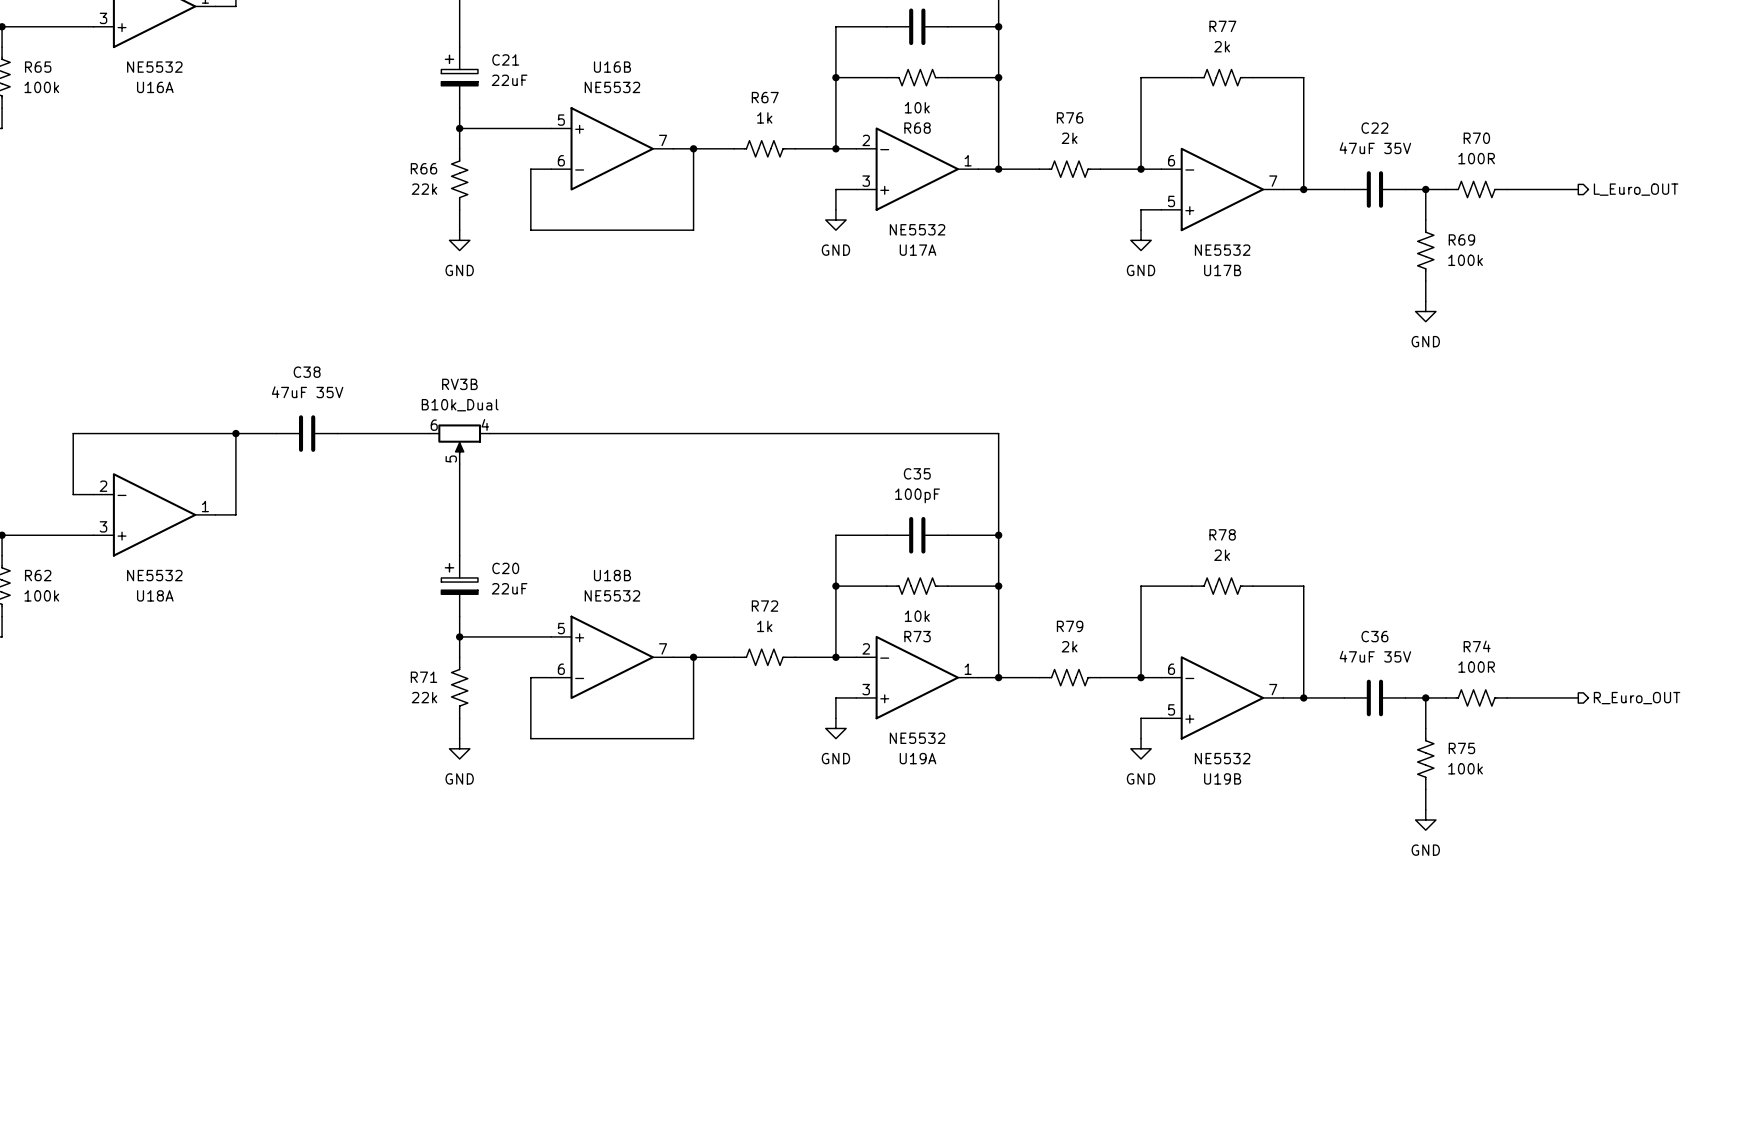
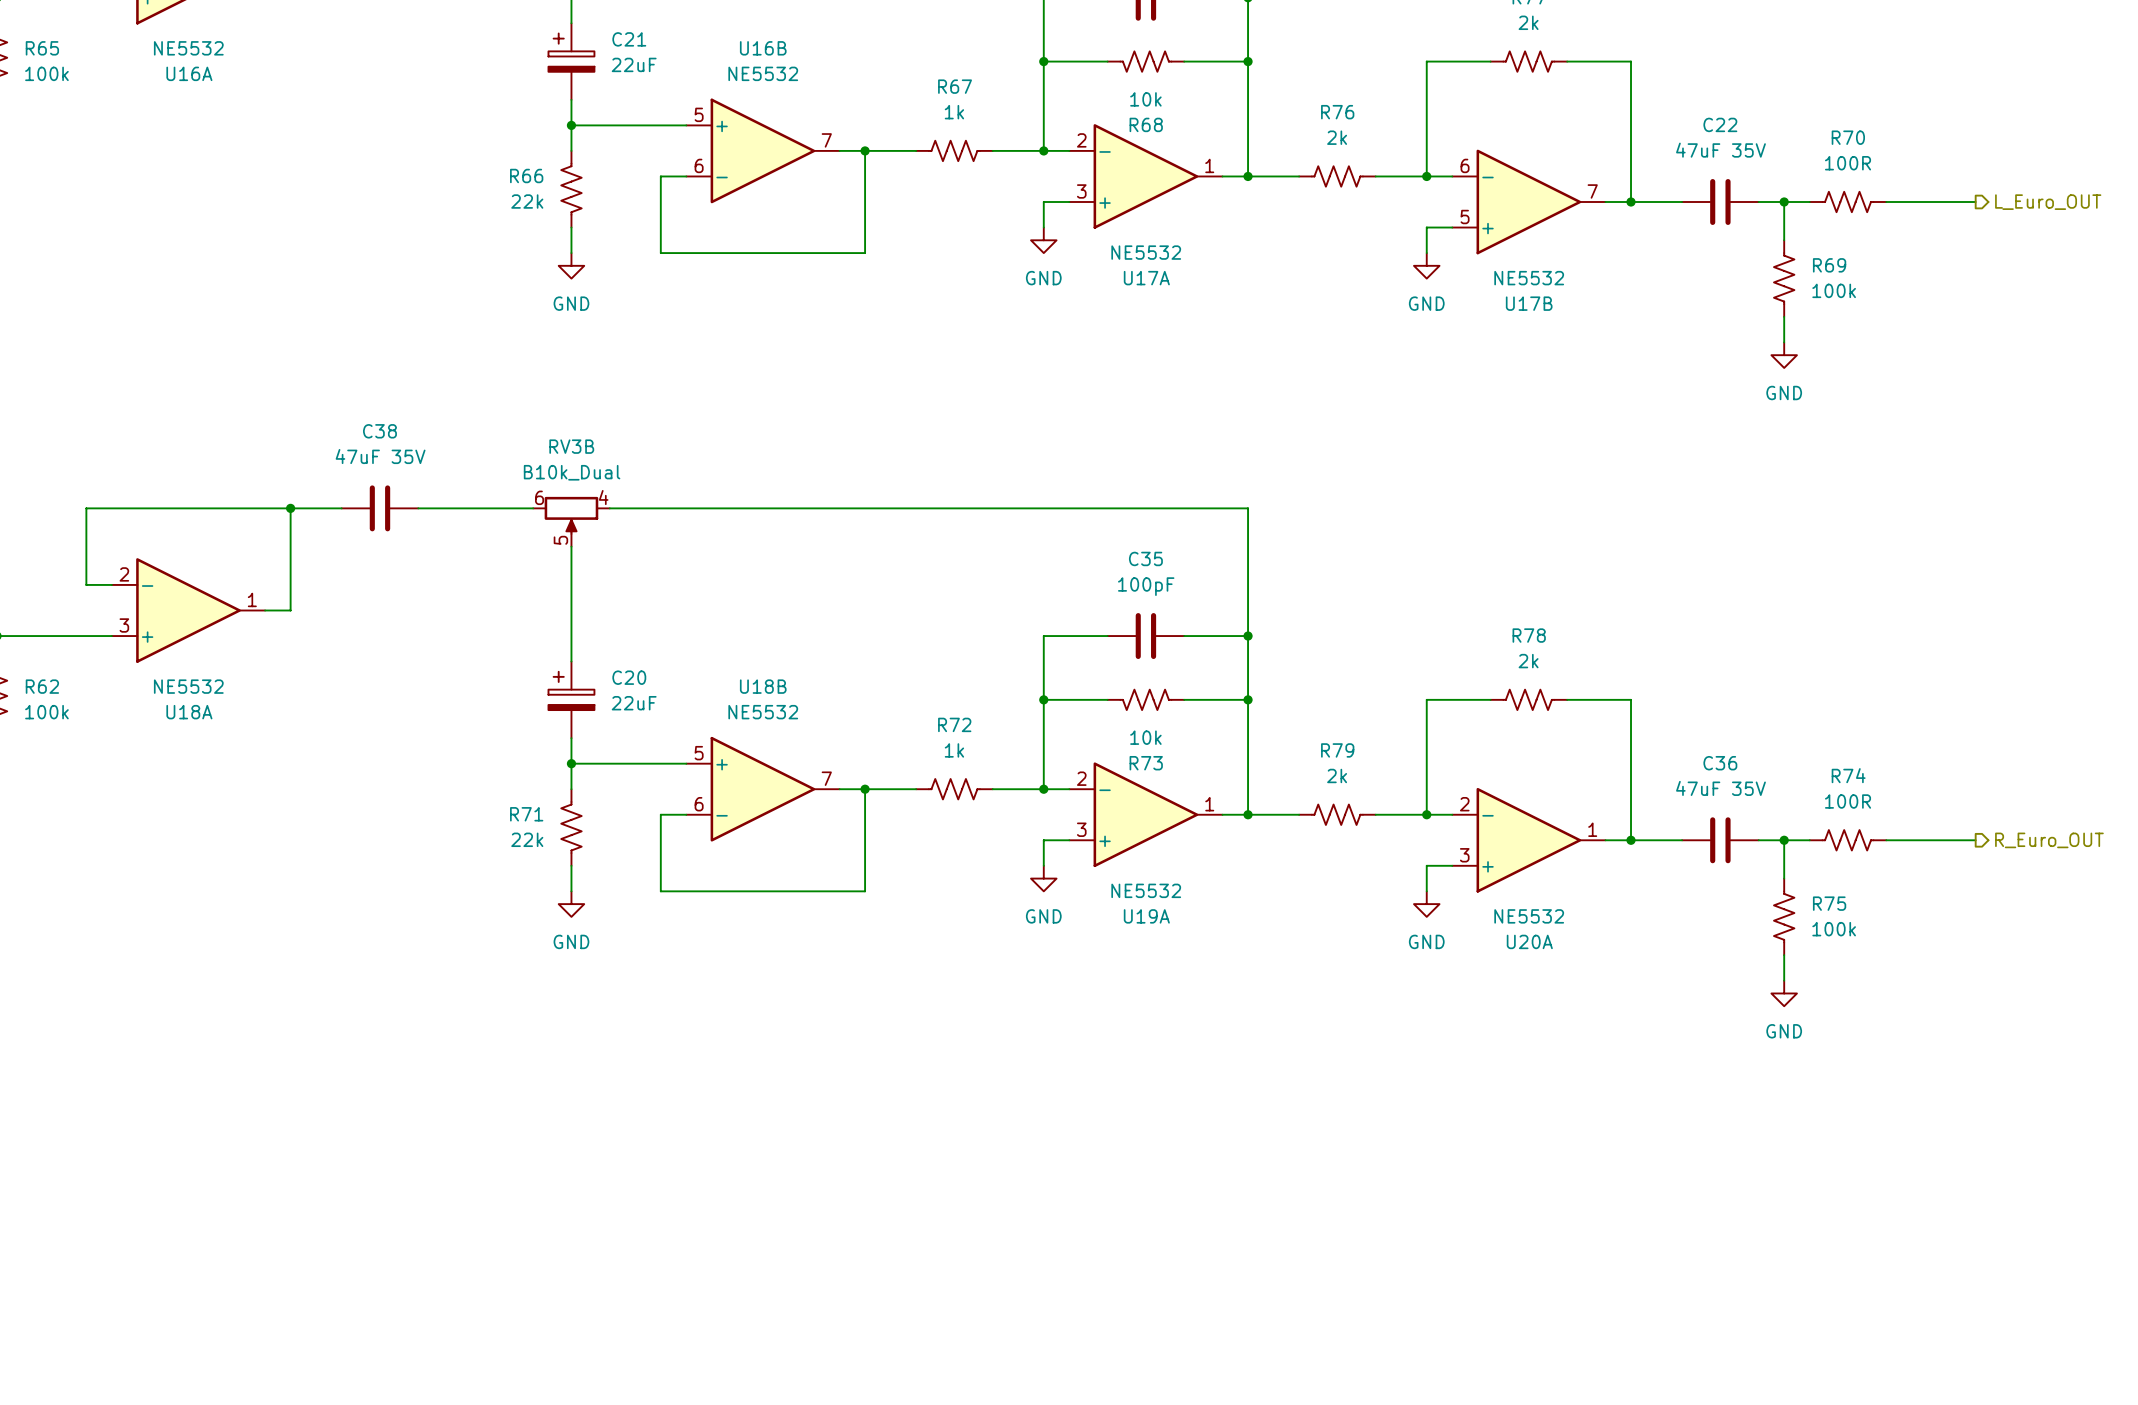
U19B pin number: 6 (1171, 669) -> 2 (1464, 804)
U19B pin number: 7 (1273, 689) -> 1 (1592, 829)
U19B pin number: 5 (1171, 709) -> 3 (1464, 855)
U19B name: U19B (1222, 778) -> U20A (1529, 941)

